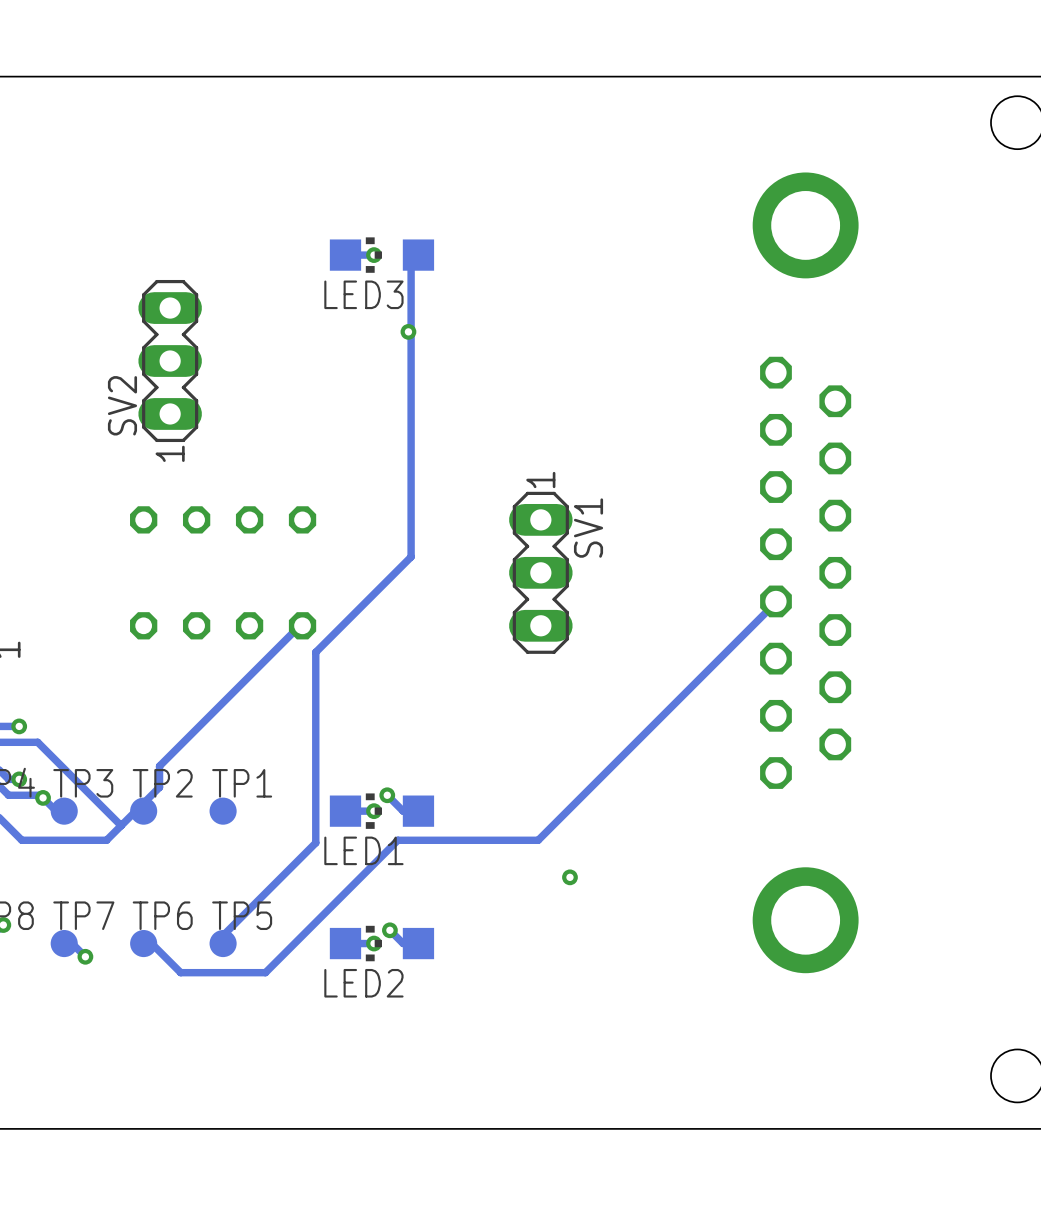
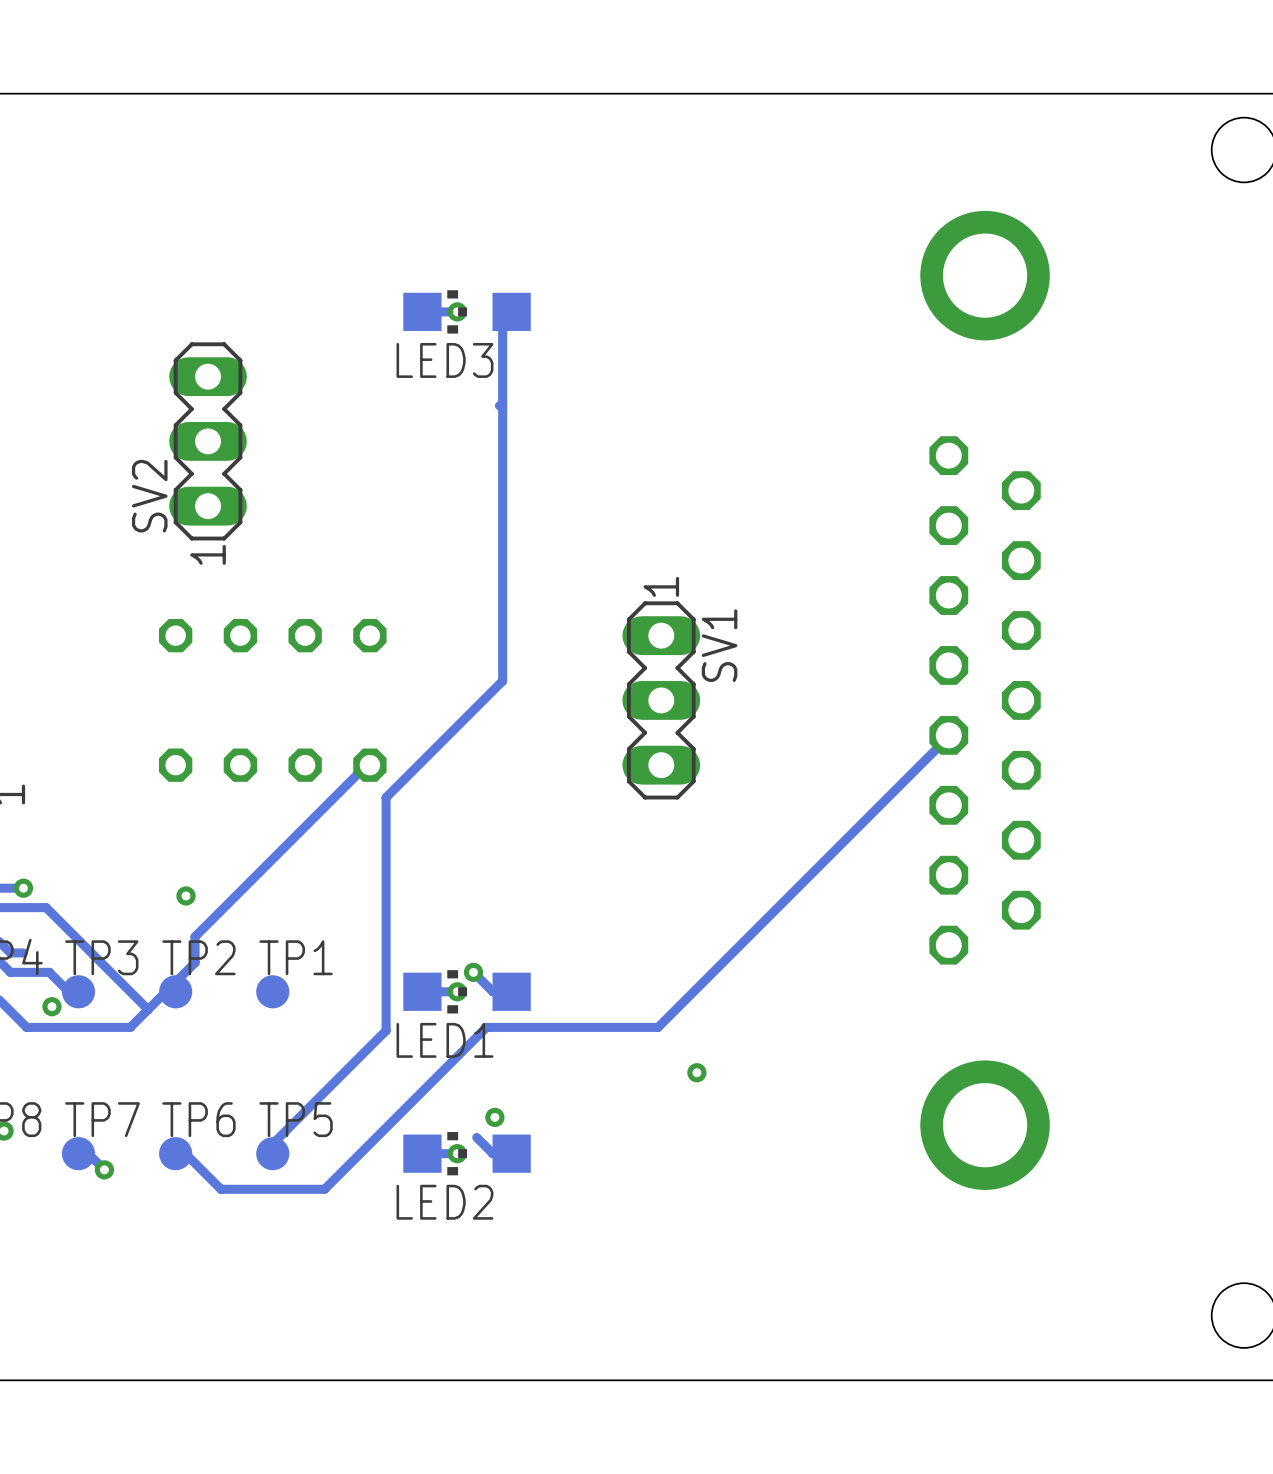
via: (408, 331) -> none
via: none -> (186, 895)
via: (19, 779) -> none
via: (43, 797) -> none
via: none -> (51, 1006)
via position: (389, 930) -> (494, 1117)

